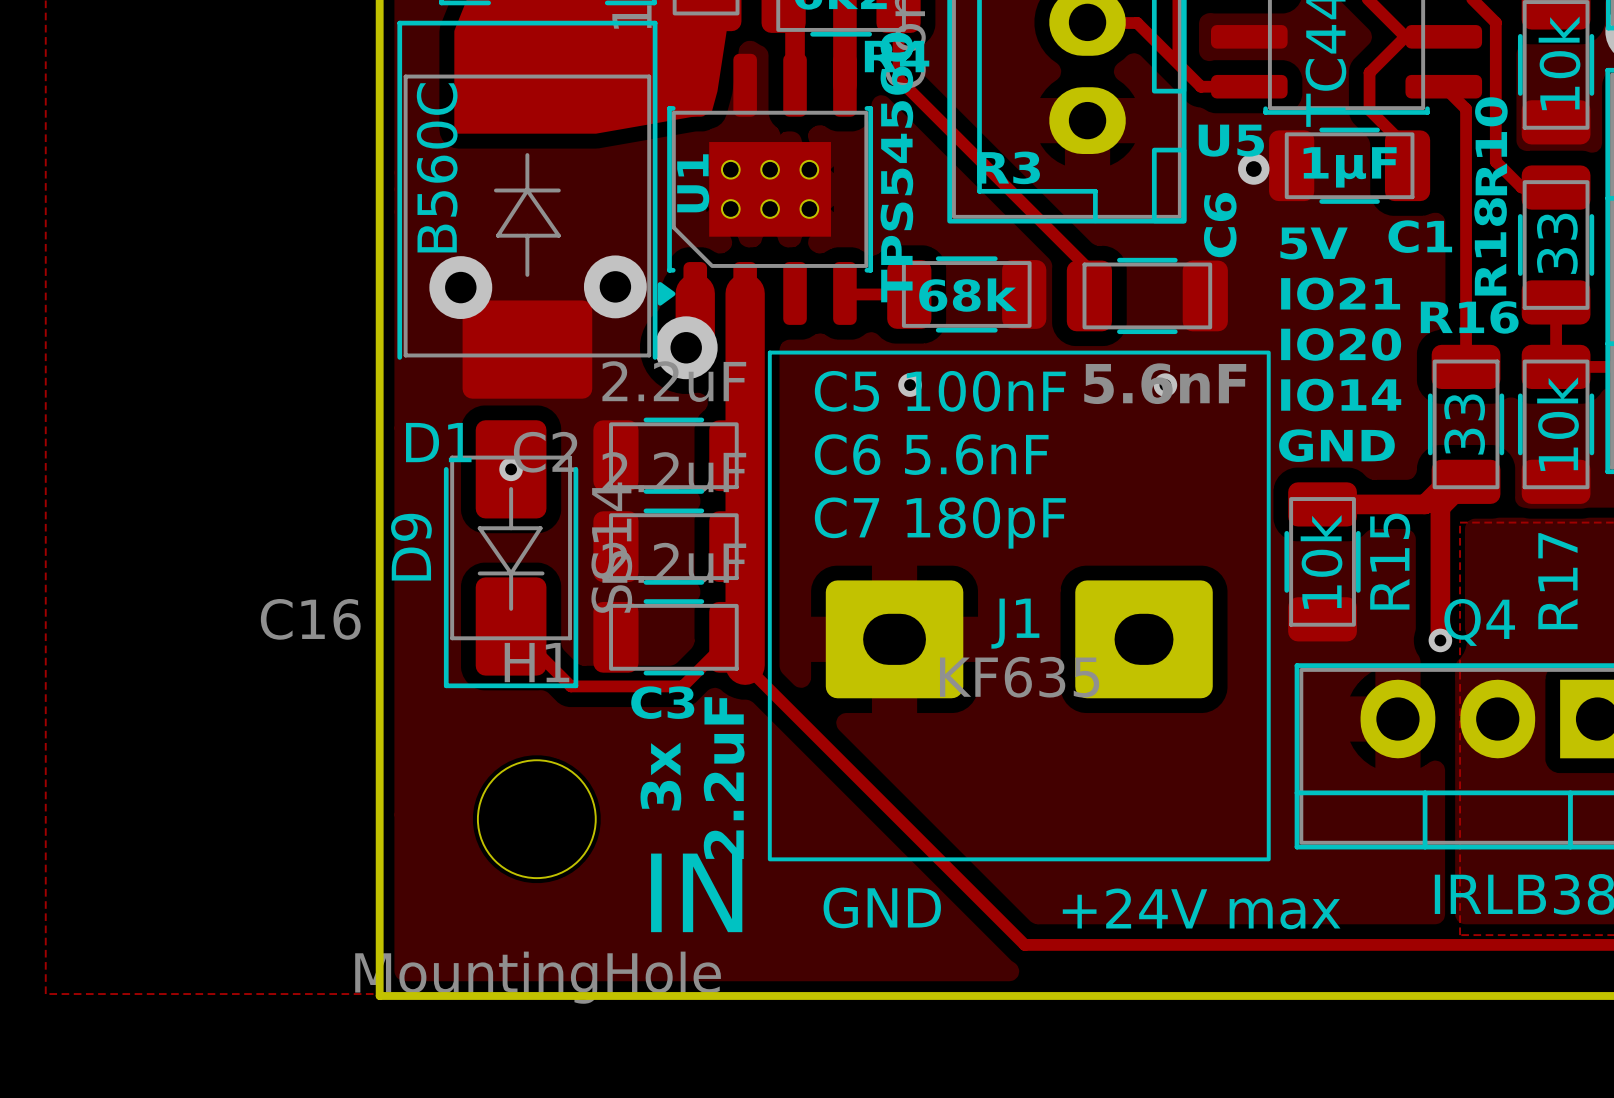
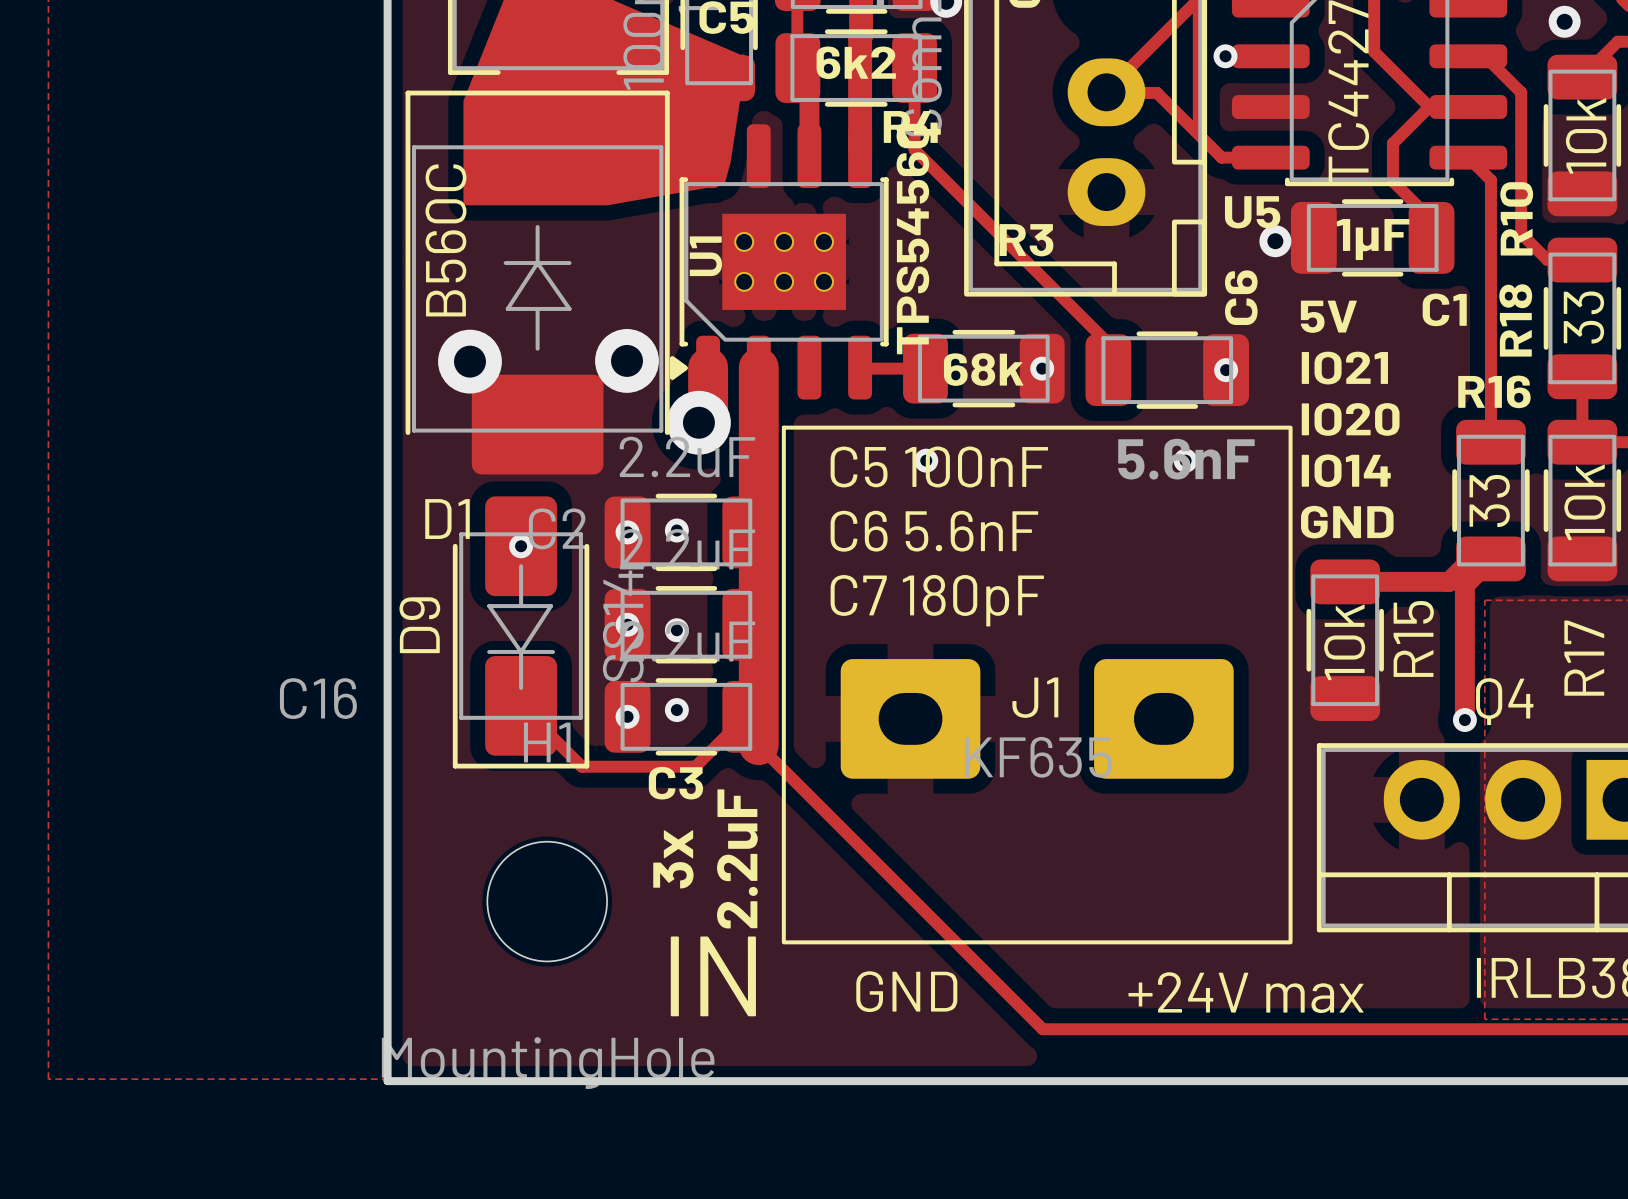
via: none -> (1042, 368)
via: none -> (1226, 370)
via: none -> (676, 530)
via: none -> (627, 532)
via: none -> (627, 624)
via: none -> (676, 630)
via: none -> (676, 710)
via: none -> (627, 716)

